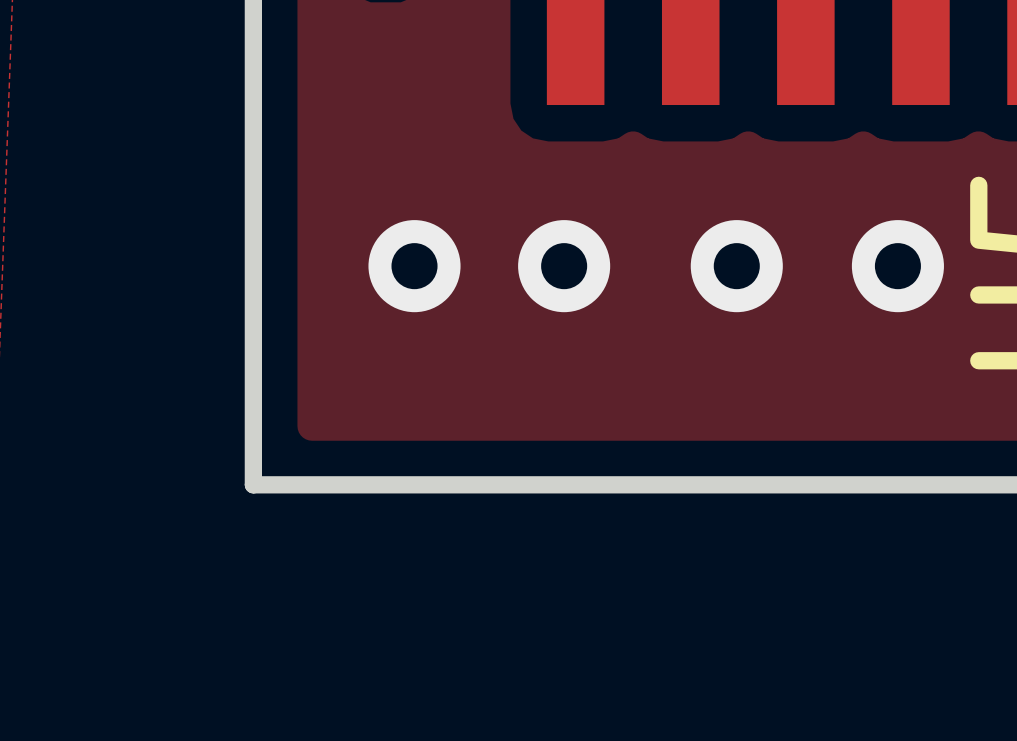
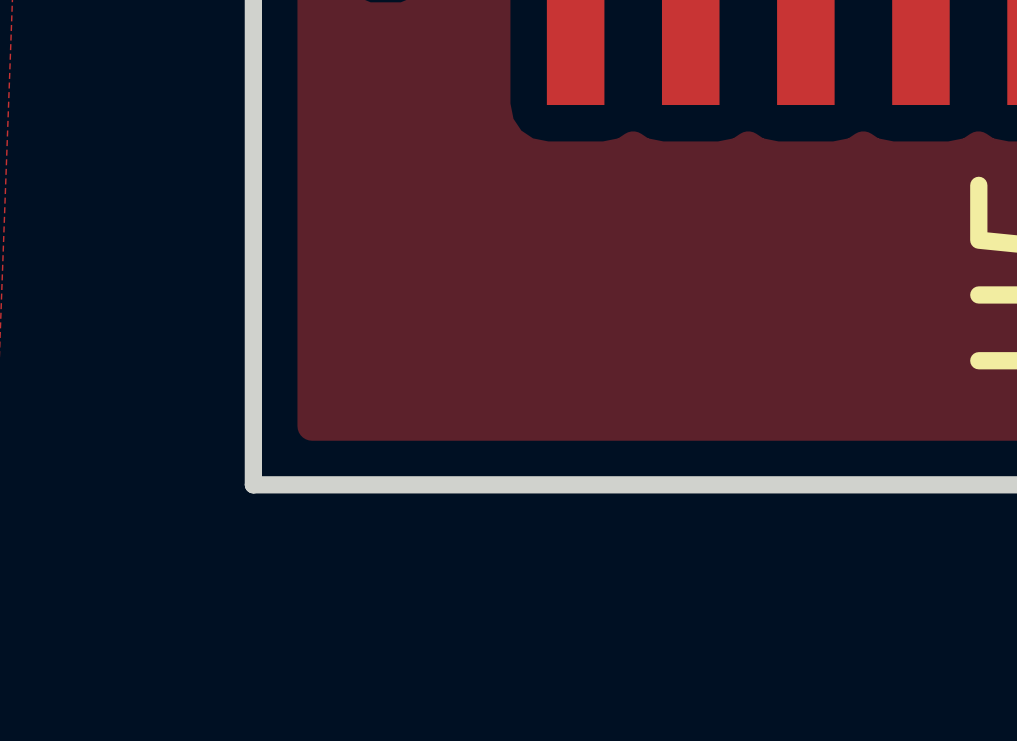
via: (414, 266) -> none
via: (564, 266) -> none
via: (736, 266) -> none
via: (897, 266) -> none

